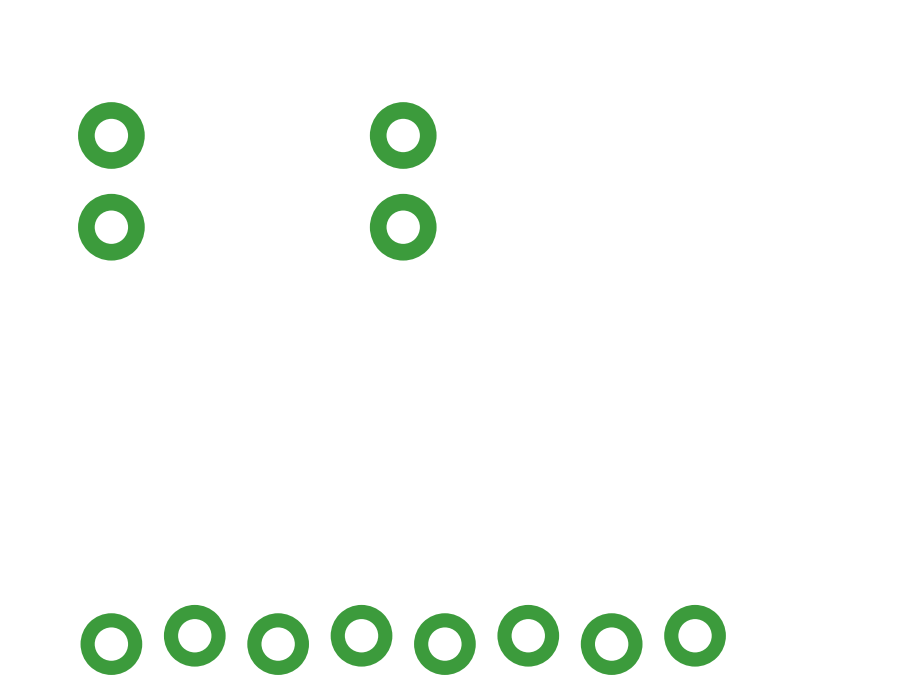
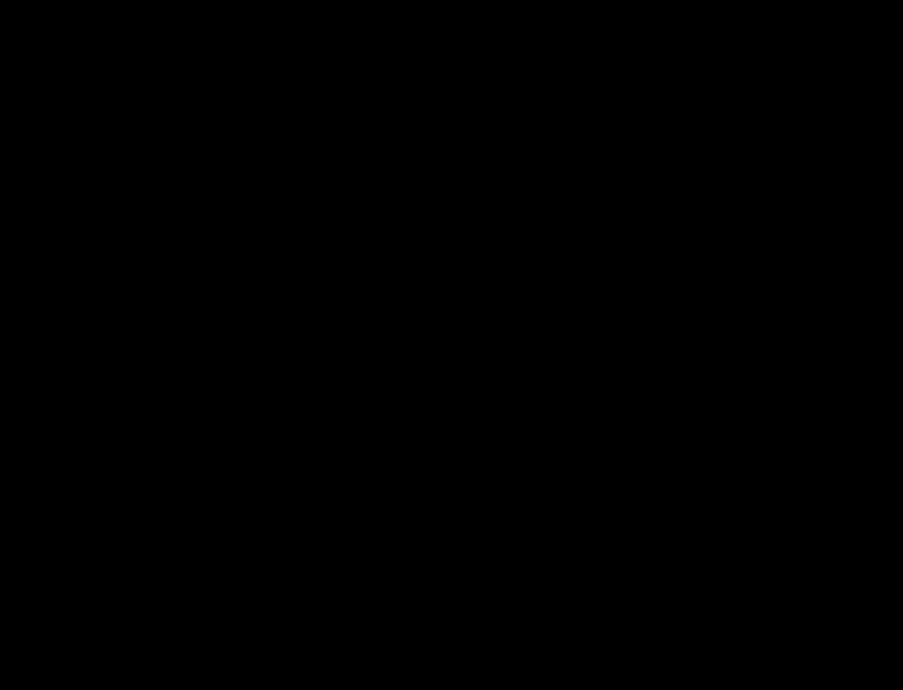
part: (111, 181) -> none
part: (403, 181) -> none
part: (403, 639) -> none

